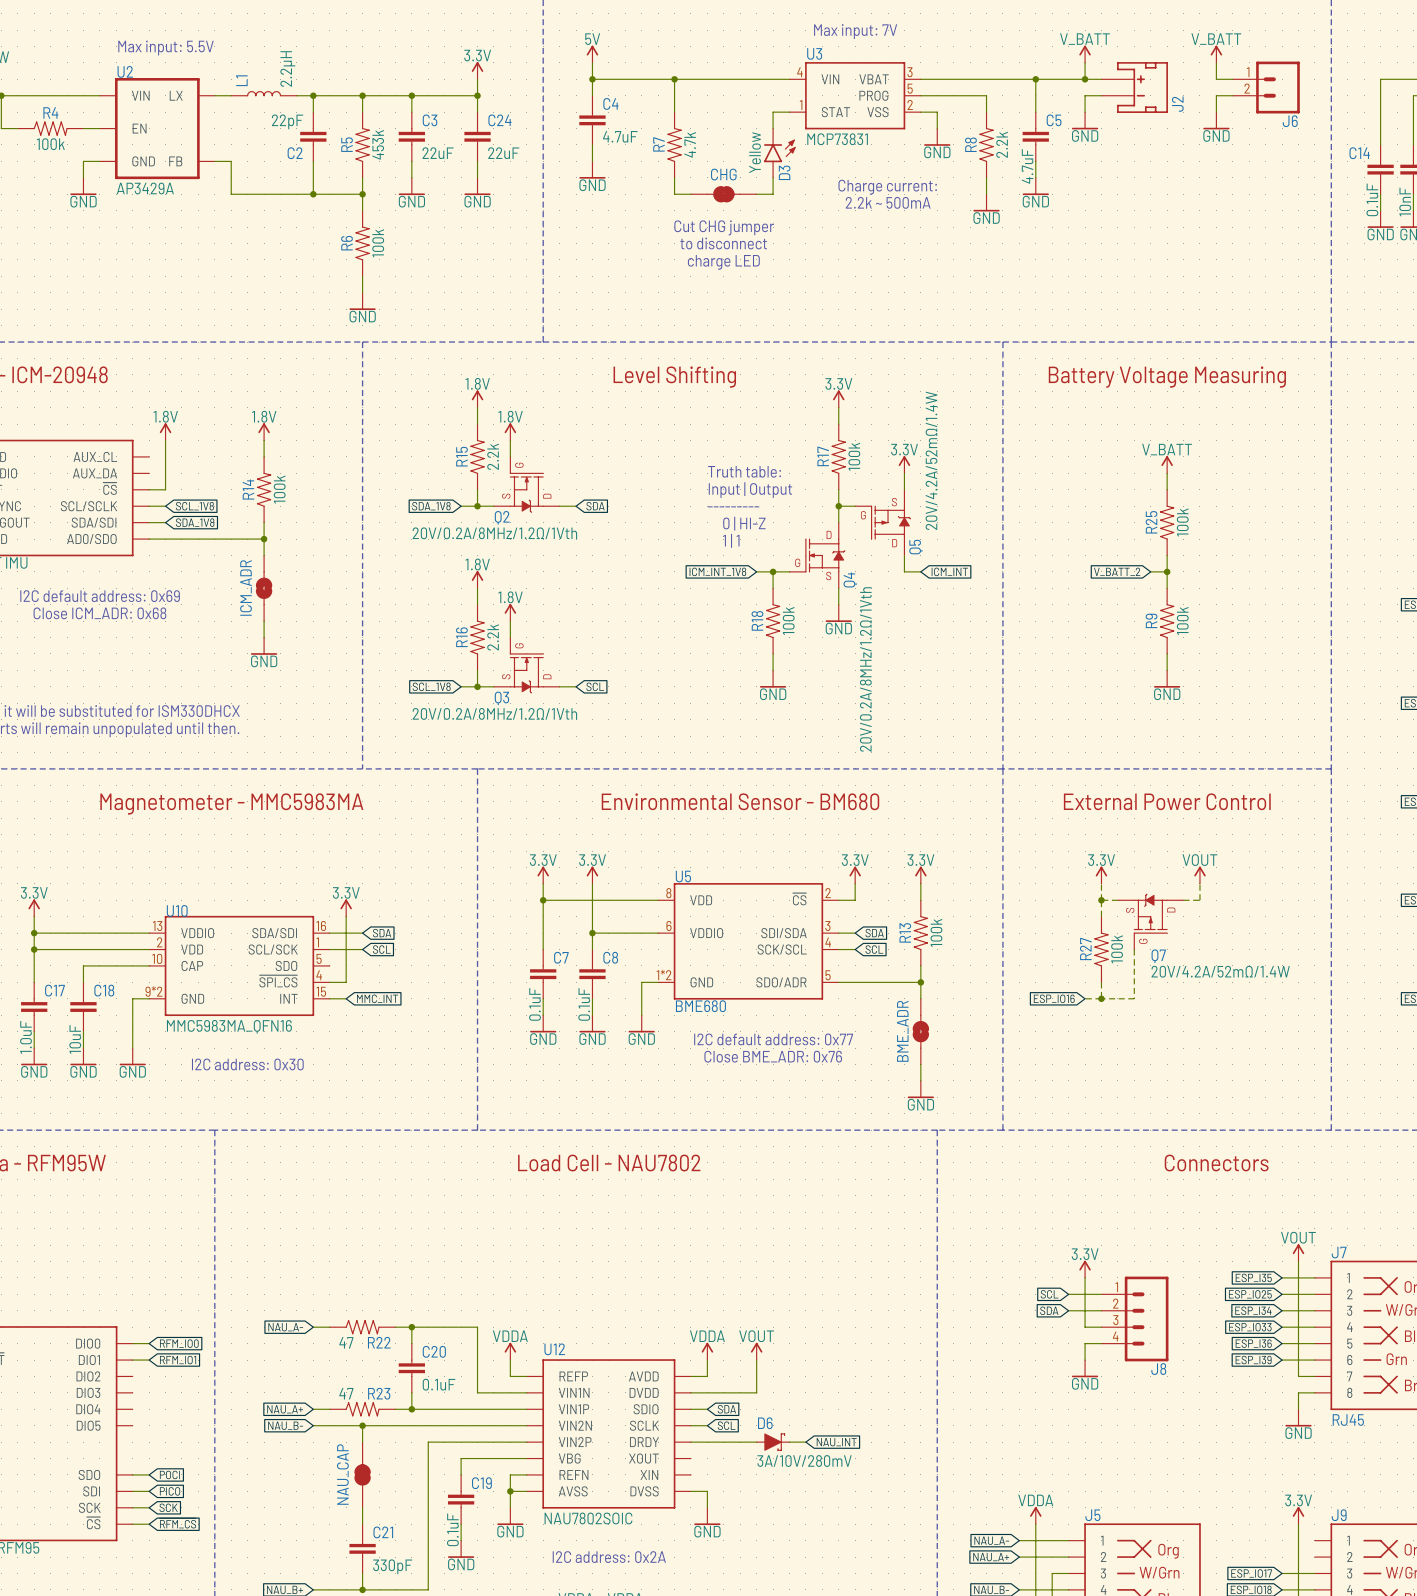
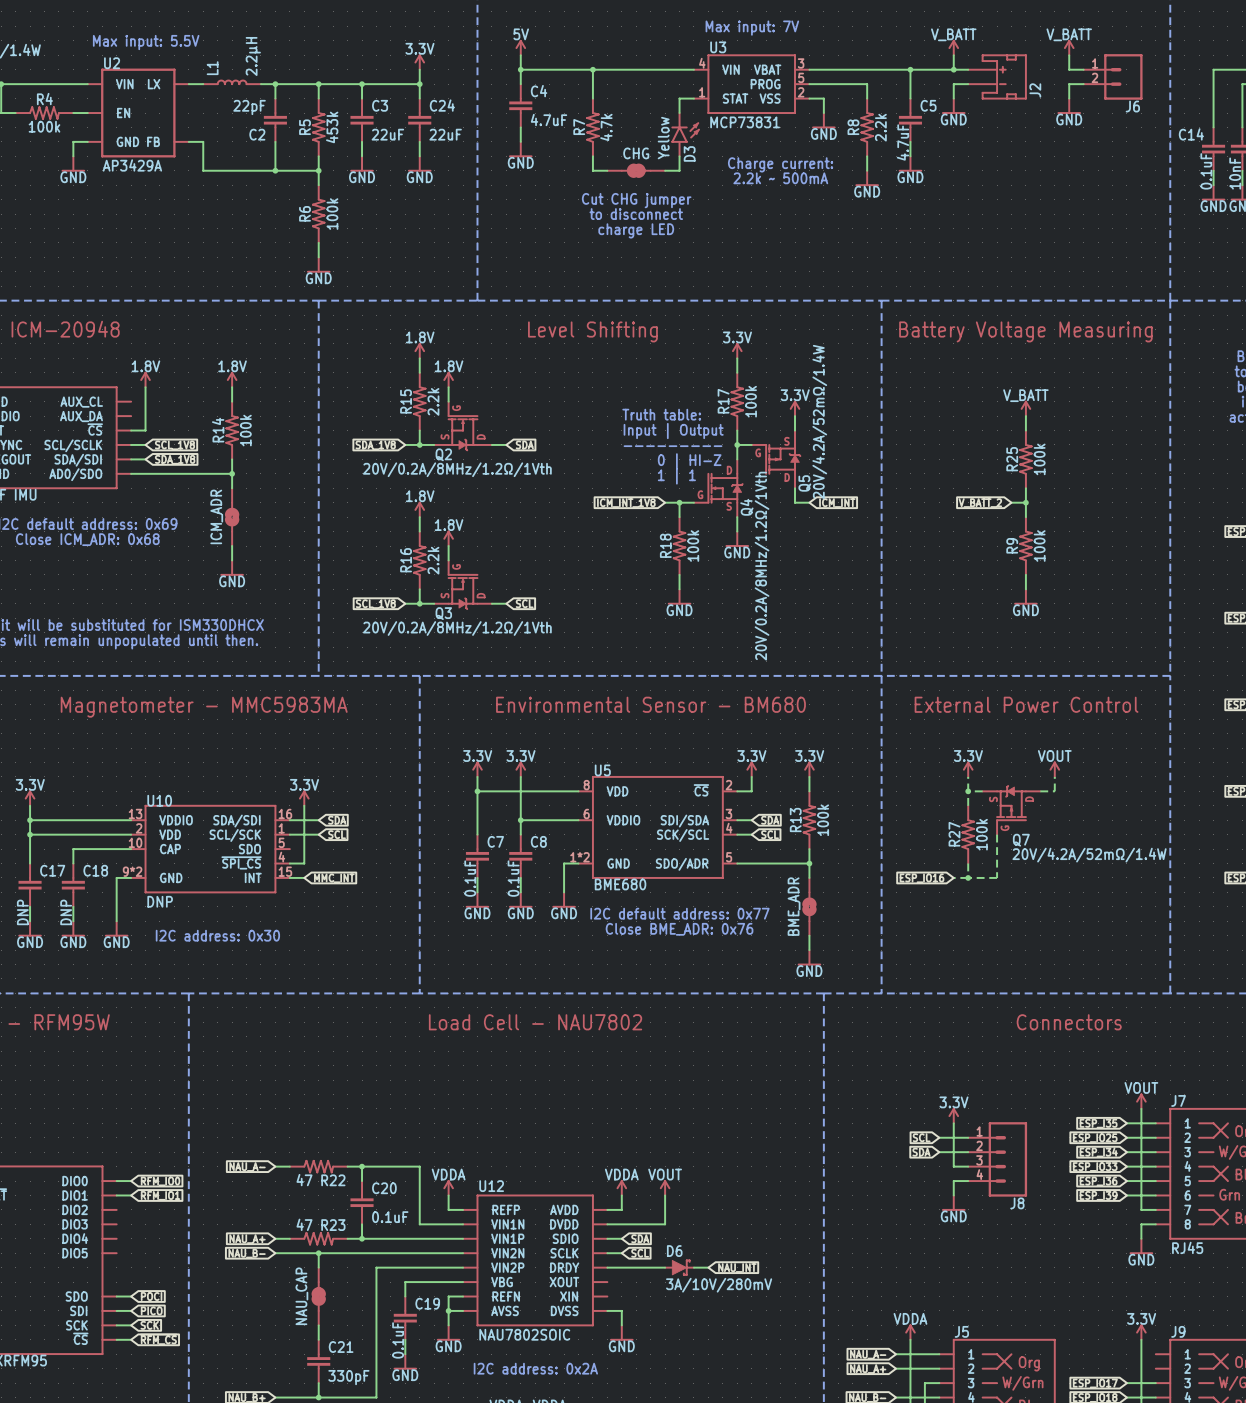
U10 value: MMC5983MA_QFN16 (229, 1026) -> DNP (160, 901)
C17 value: 1.0uF (25, 1037) -> DNP (22, 912)
C18 value: 10uF (75, 1039) -> DNP (66, 912)

